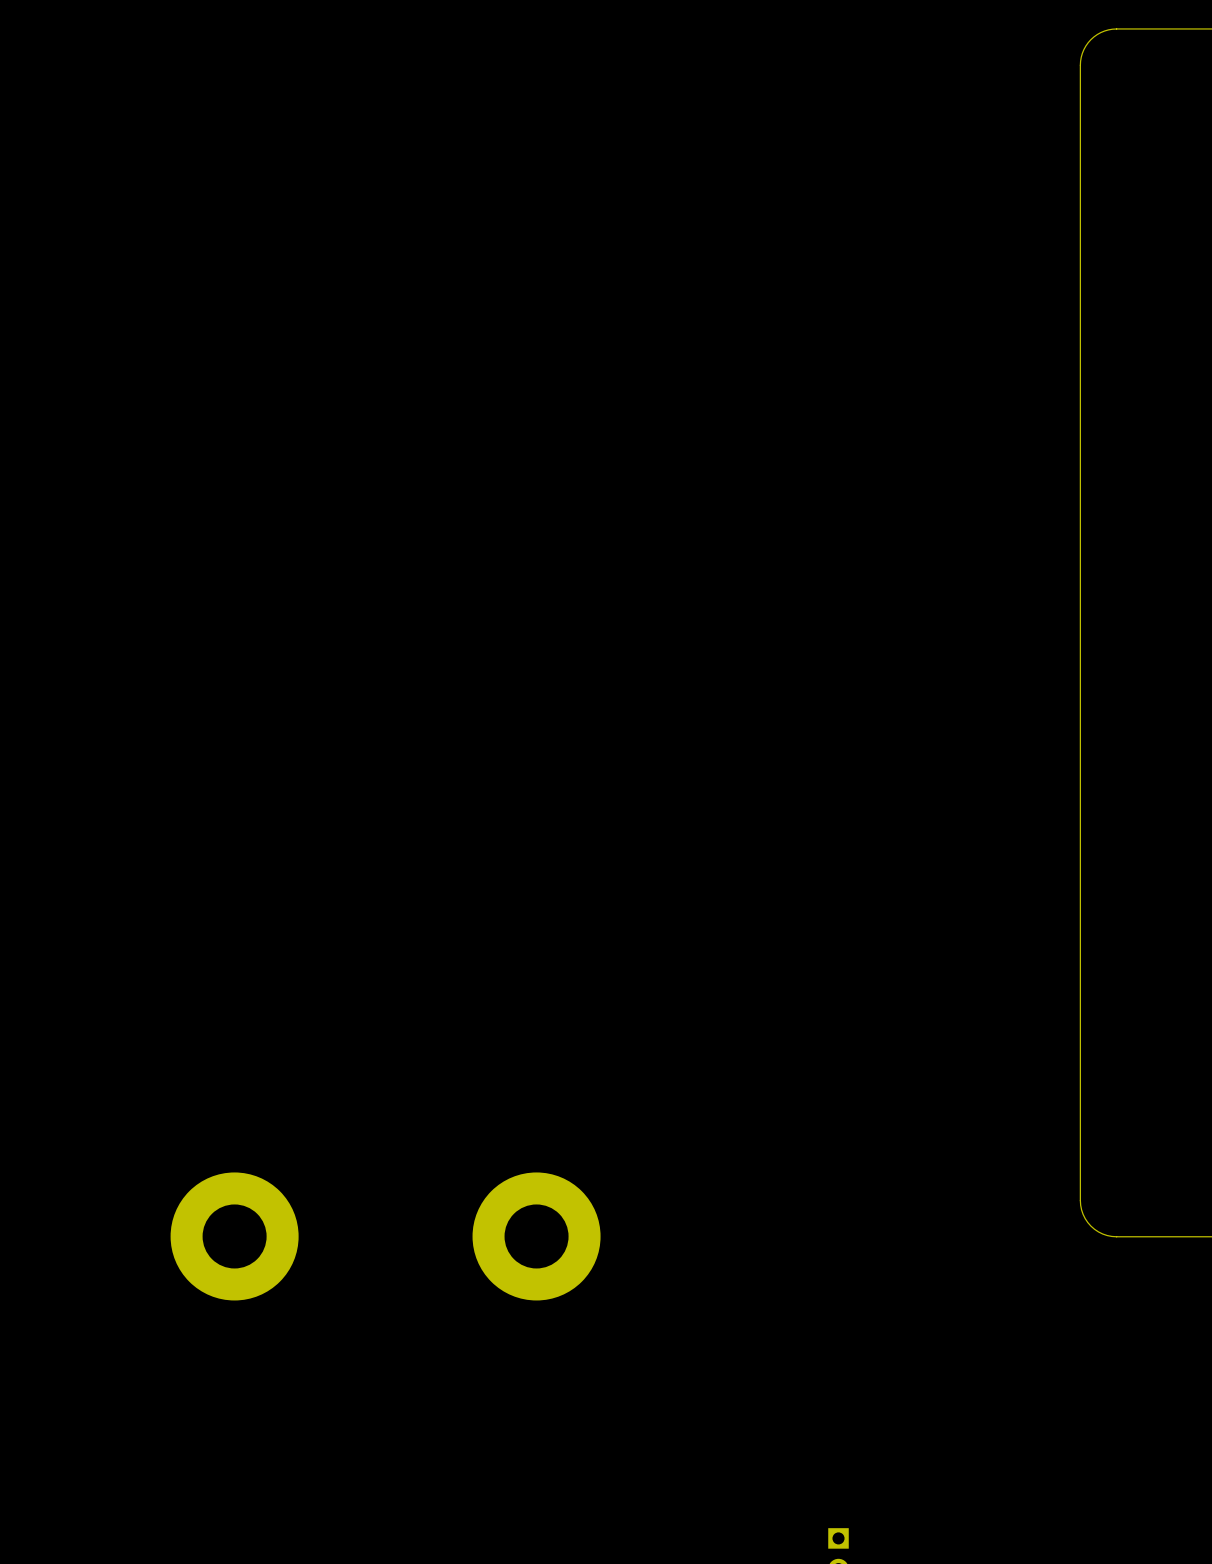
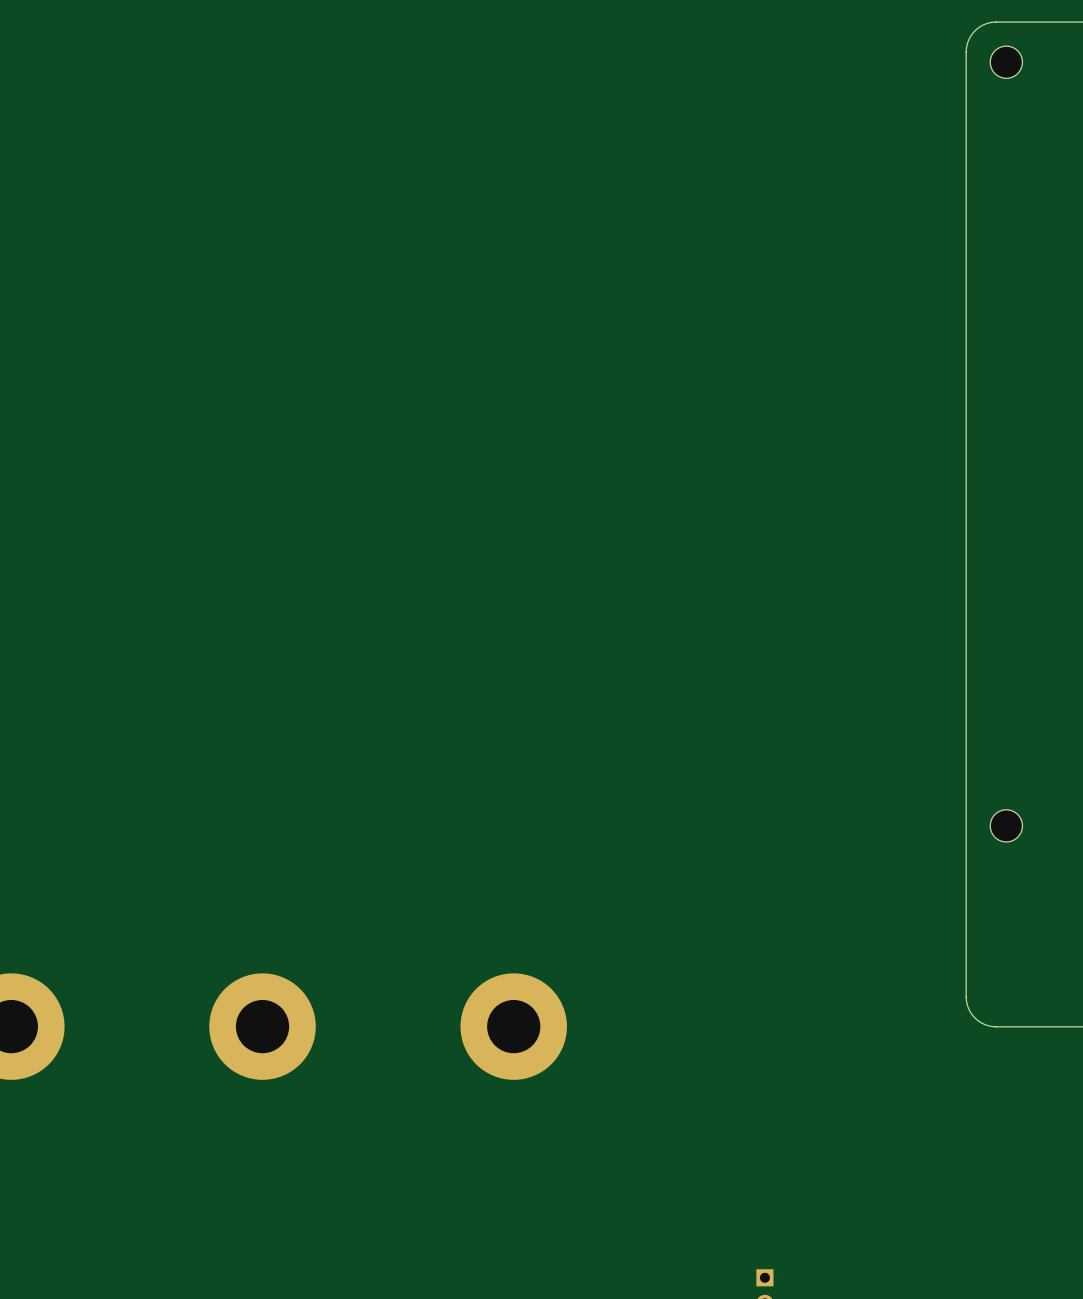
part: none -> (1006, 62)
part: none -> (1006, 825)

